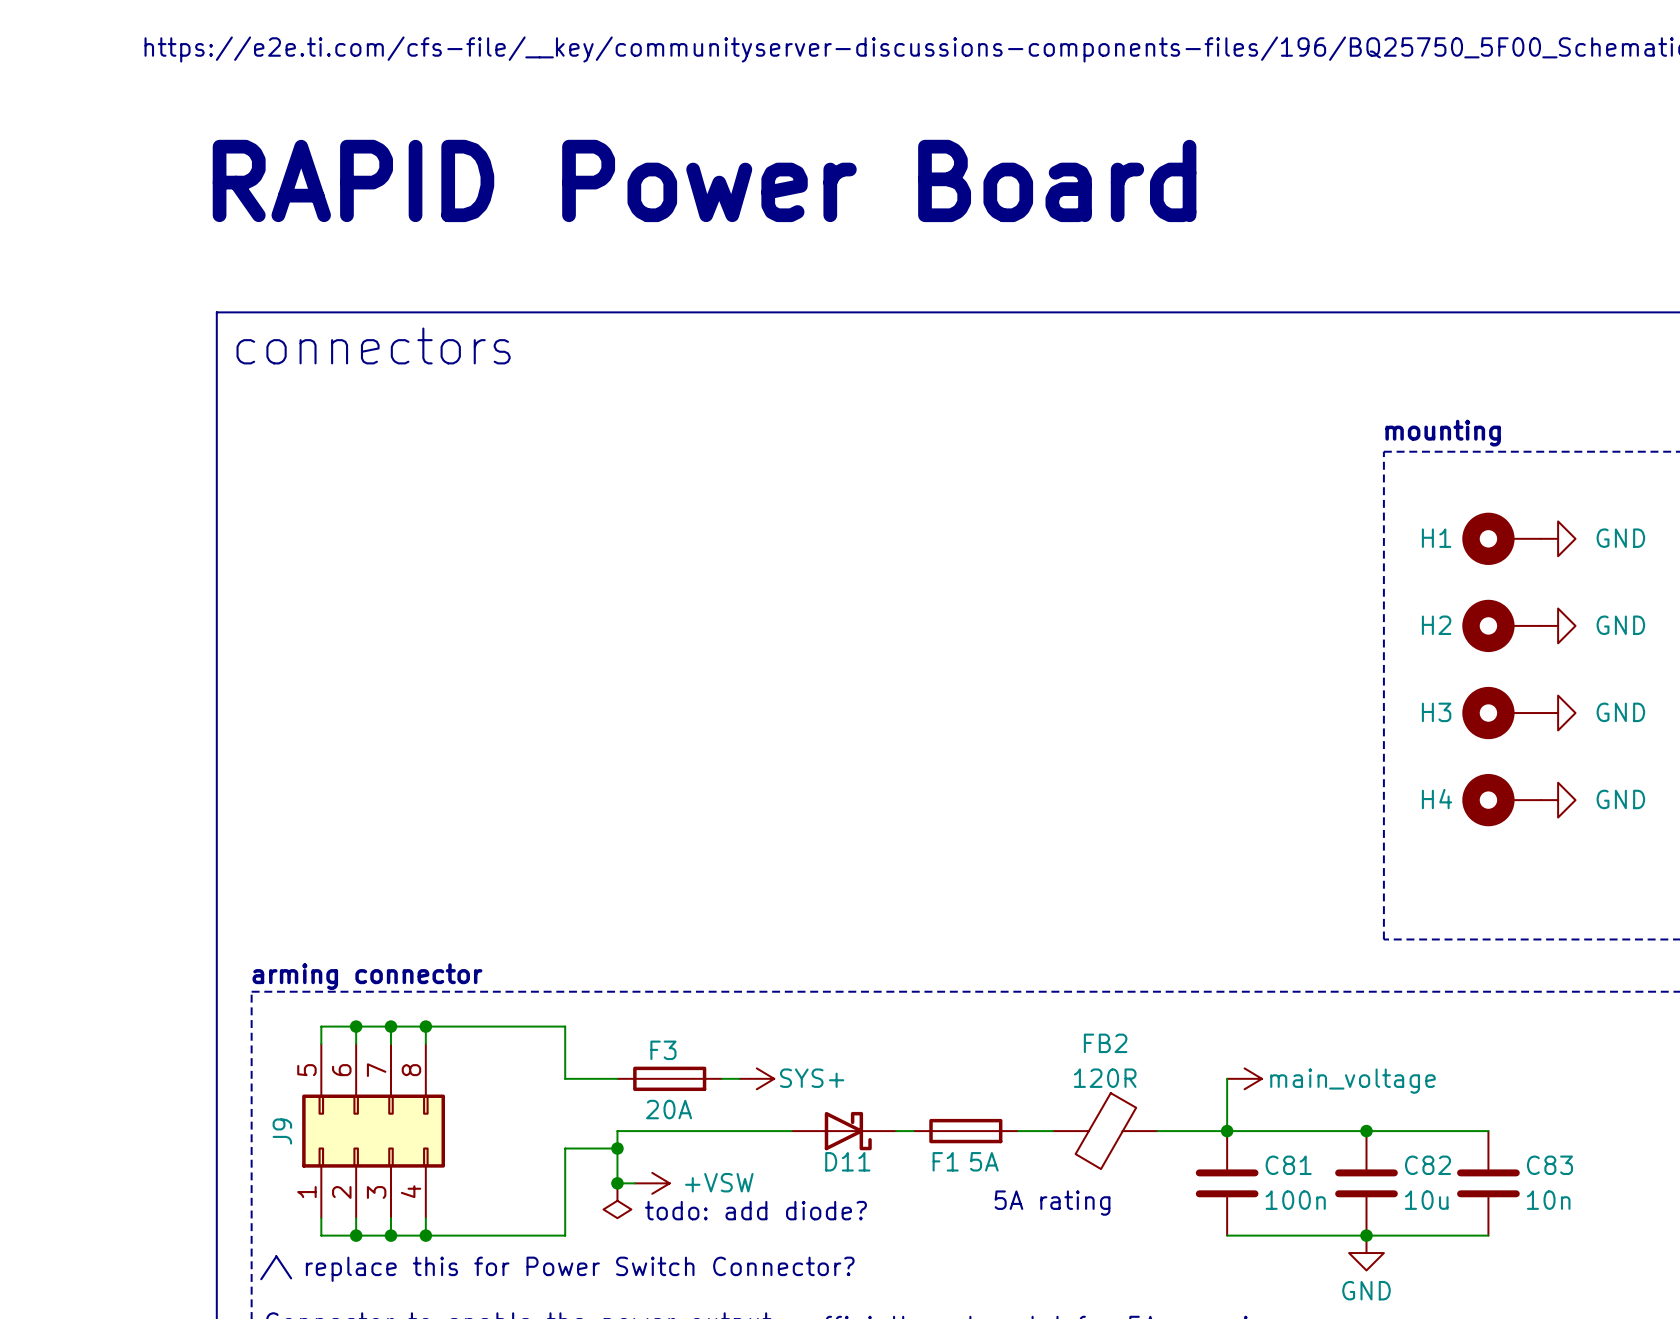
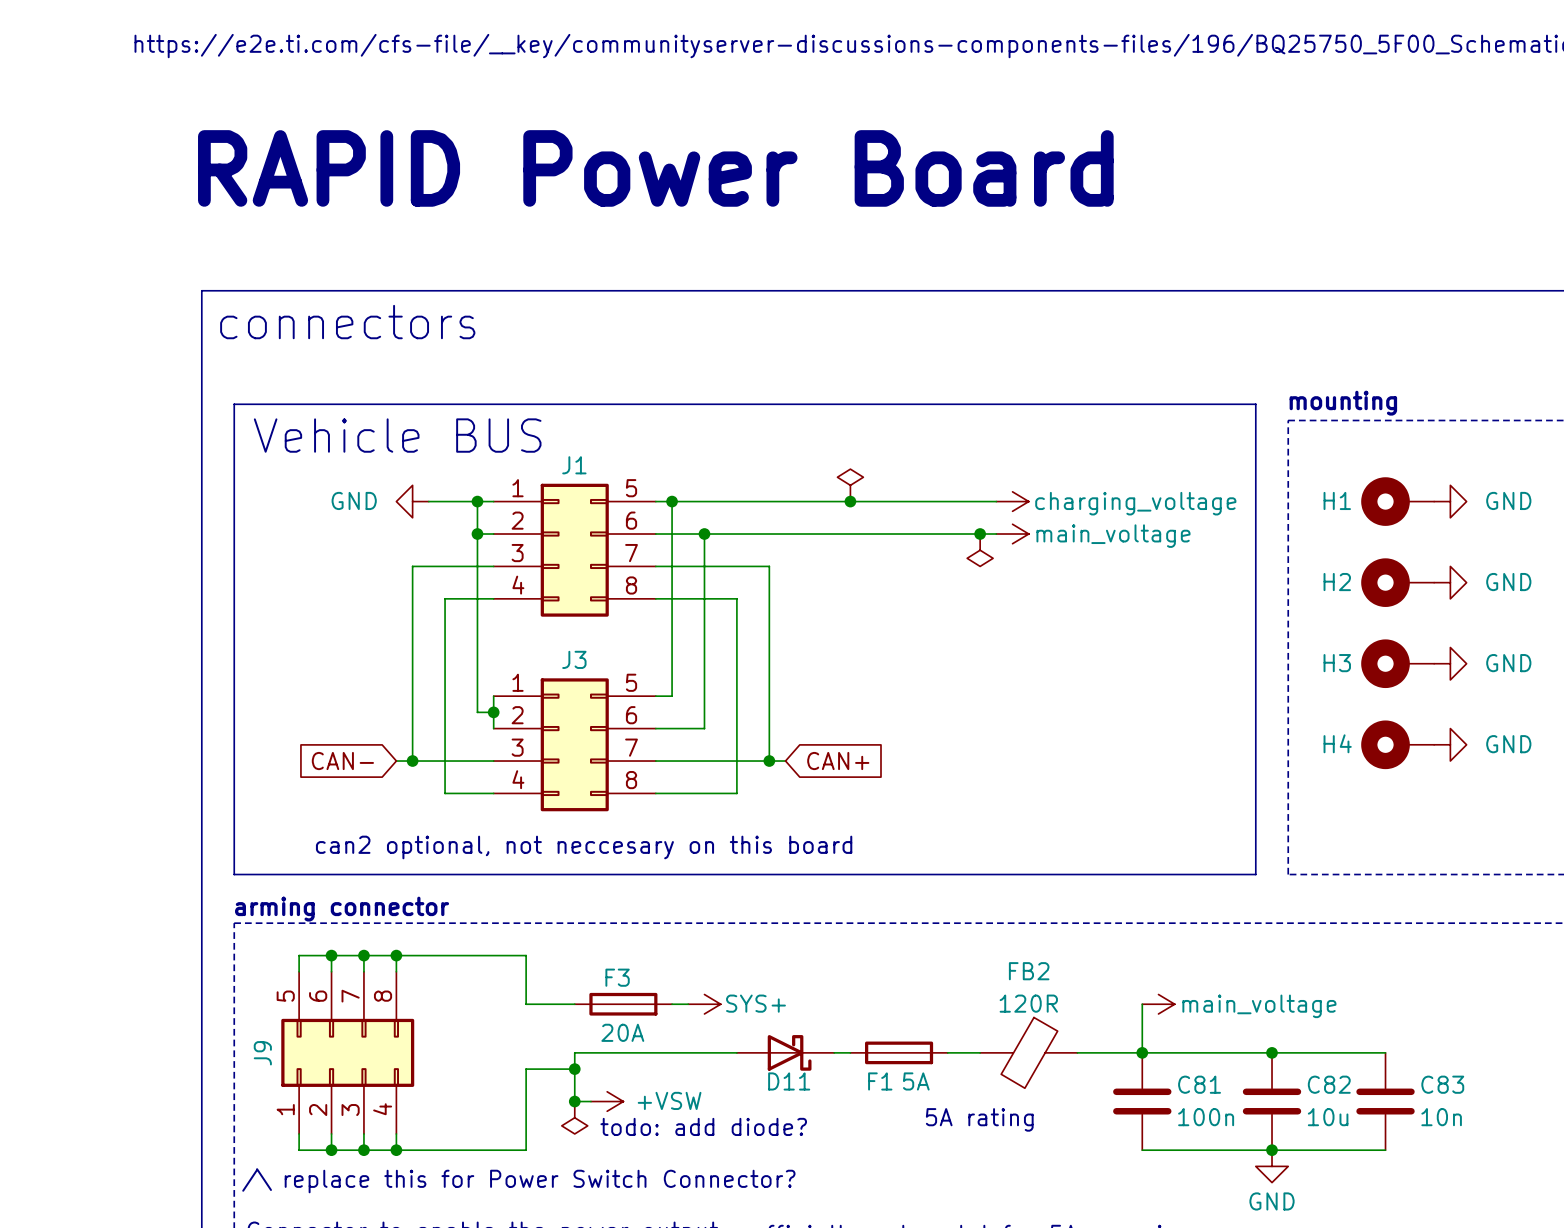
line: none -> (234, 404) (1255, 404) (1255, 874) (234, 874) (234, 404)
text: none -> Vehicle BUS (397, 435)
power symbol: none -> (850, 485)
power symbol: none -> GND (412, 501)
wire: none -> (428, 501) (493, 501)
wire: none -> (477, 501) (477, 712) (493, 712)
junction: none -> (477, 501)
wire: none -> (655, 501) (996, 501)
wire: none -> (672, 501) (672, 696) (655, 696)
junction: none -> (672, 501)
junction: none -> (850, 501)
power symbol: none -> charging_voltage (1012, 501)
wire: none -> (477, 534) (493, 534)
junction: none -> (477, 534)
wire: none -> (655, 534) (996, 534)
wire: none -> (704, 534) (704, 728) (655, 728)
junction: none -> (704, 534)
junction: none -> (980, 534)
power symbol: none -> main_voltage (1012, 534)
J1: none -> (574, 550)
power symbol: none -> (980, 550)
wire: none -> (493, 566) (412, 566) (412, 761)
wire: none -> (655, 566) (769, 566) (769, 761)
wire: none -> (493, 598) (445, 598) (445, 793) (493, 793)
wire: none -> (655, 598) (736, 598) (736, 793) (655, 793)
wire: none -> (493, 696) (493, 728)
junction: none -> (493, 712)
J3: none -> (574, 744)
global label: none -> CAN- (342, 761)
wire: none -> (396, 761) (493, 761)
junction: none -> (412, 761)
wire: none -> (655, 761) (785, 761)
junction: none -> (769, 761)
global label: none -> CAN+ (838, 761)
text: none -> can2 optional, not neccesary on this board (584, 847)

